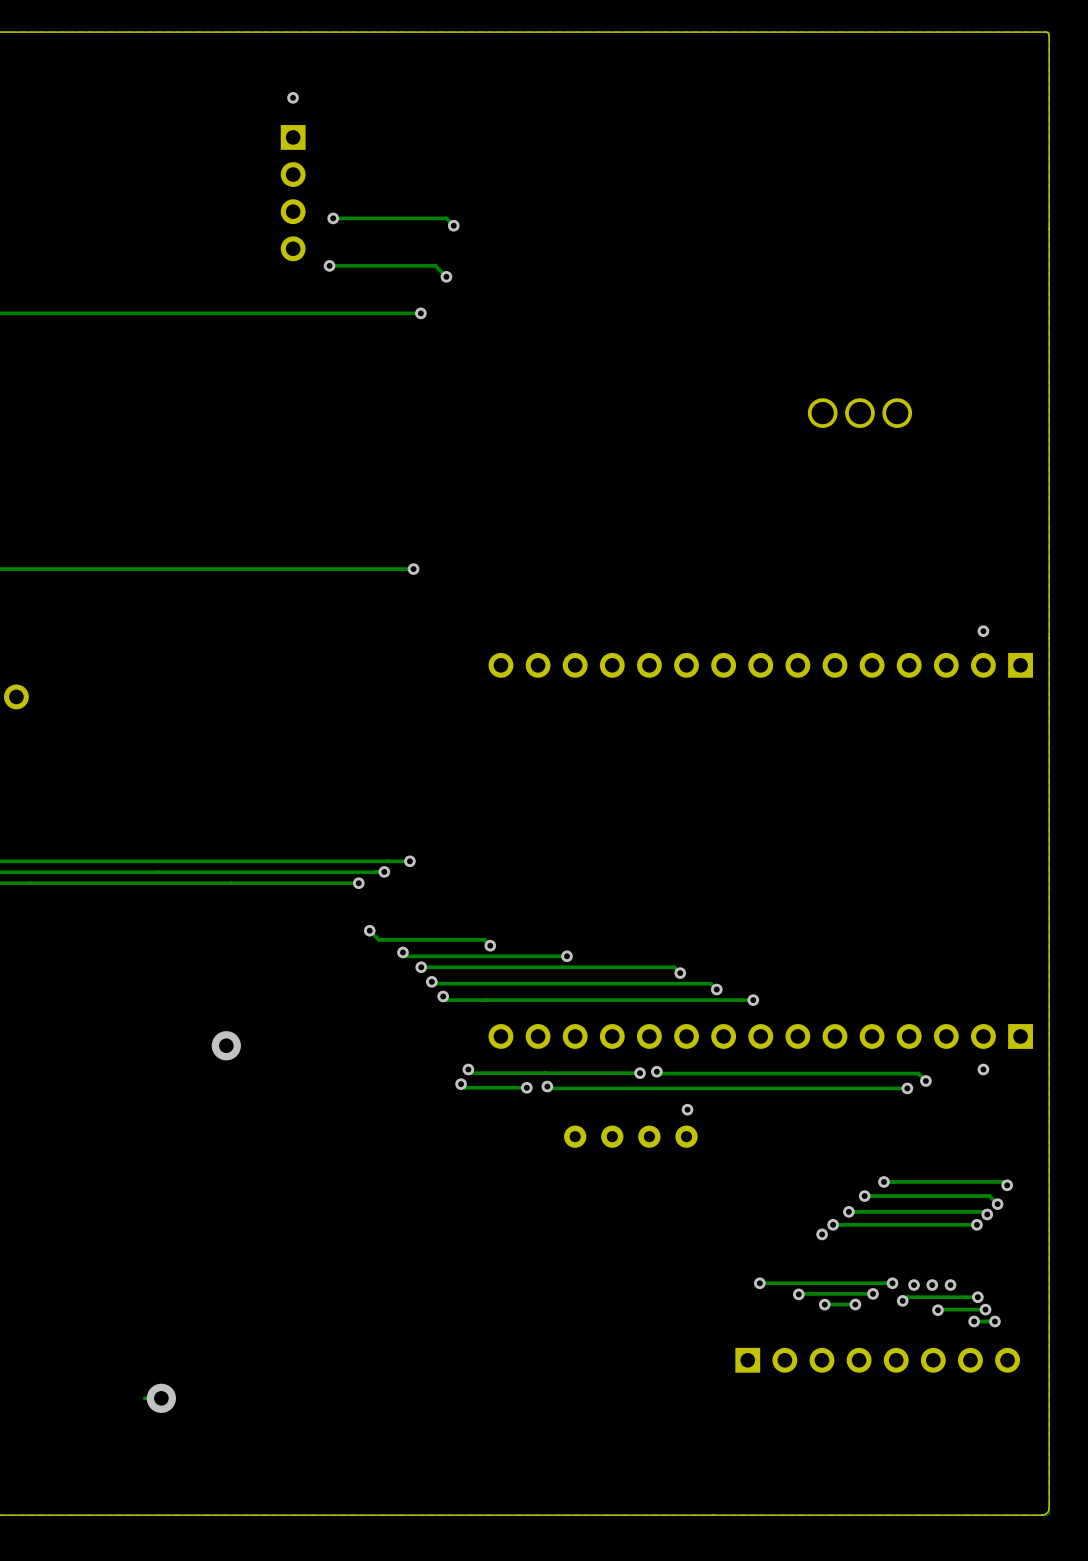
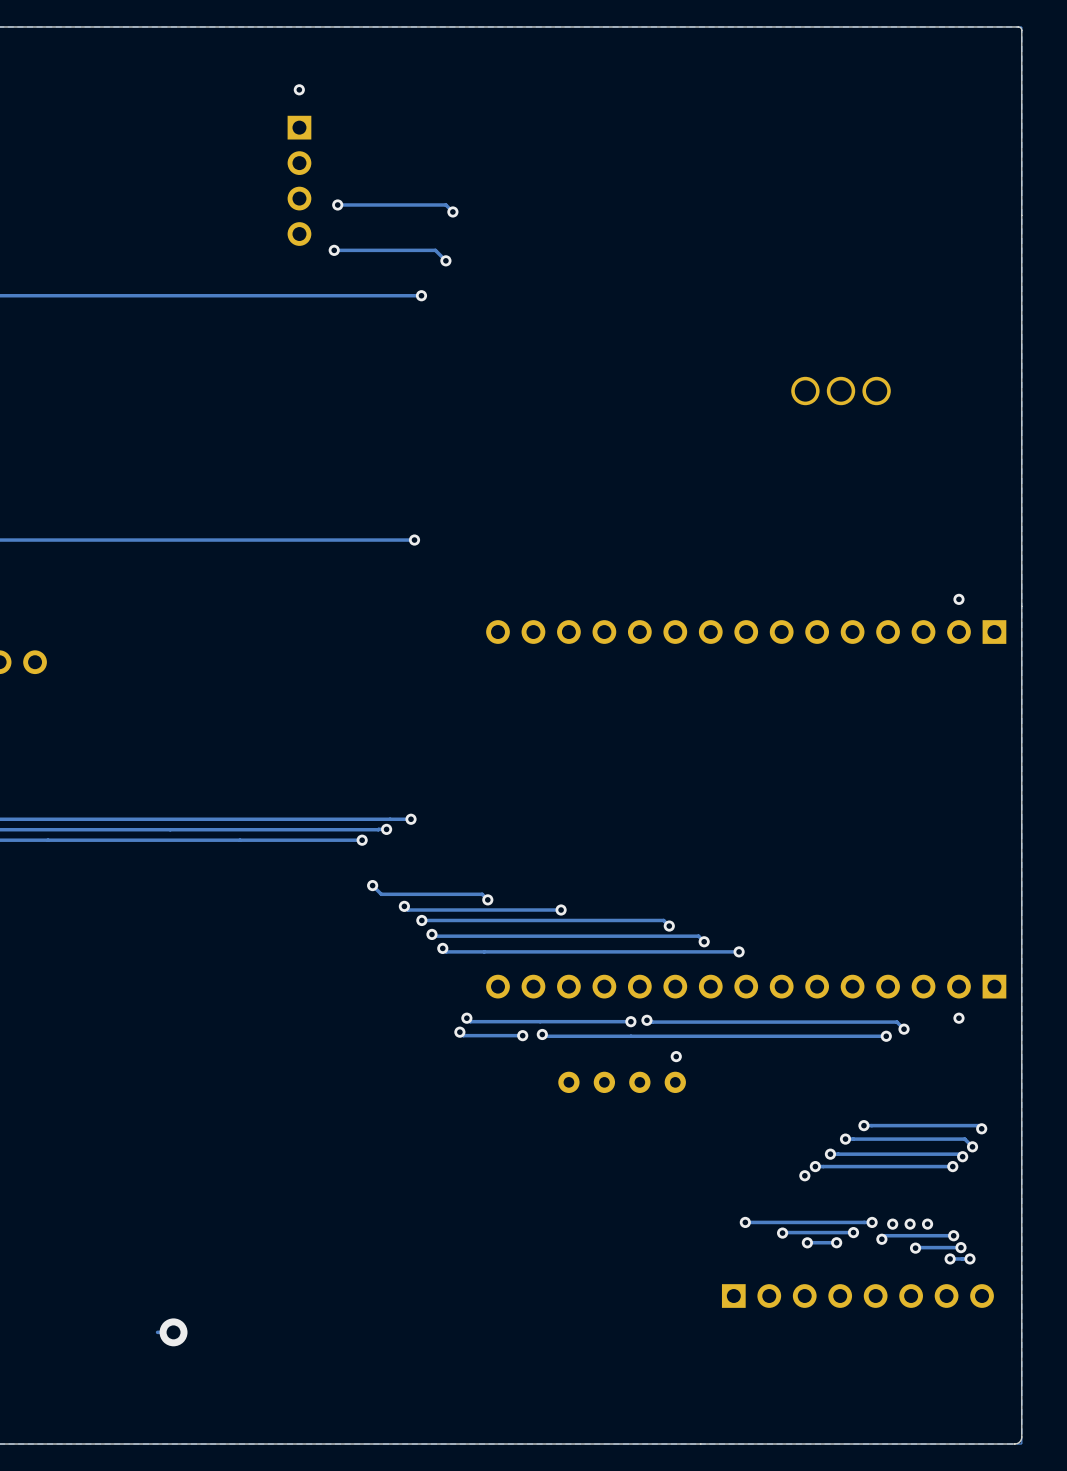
via: (226, 1045) -> none

